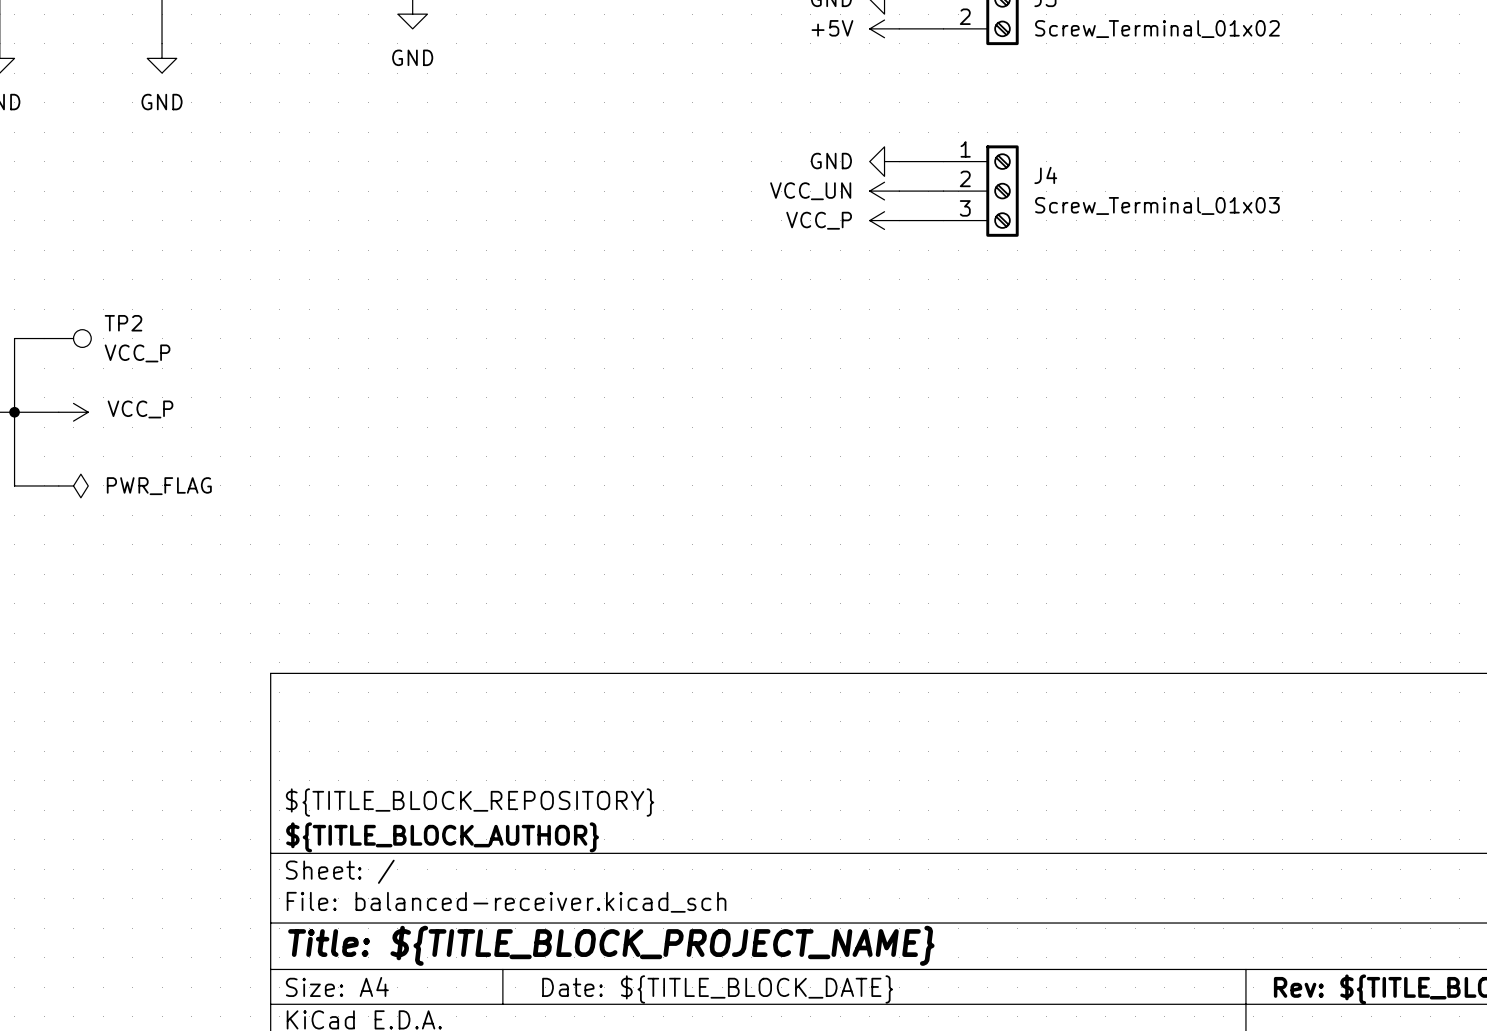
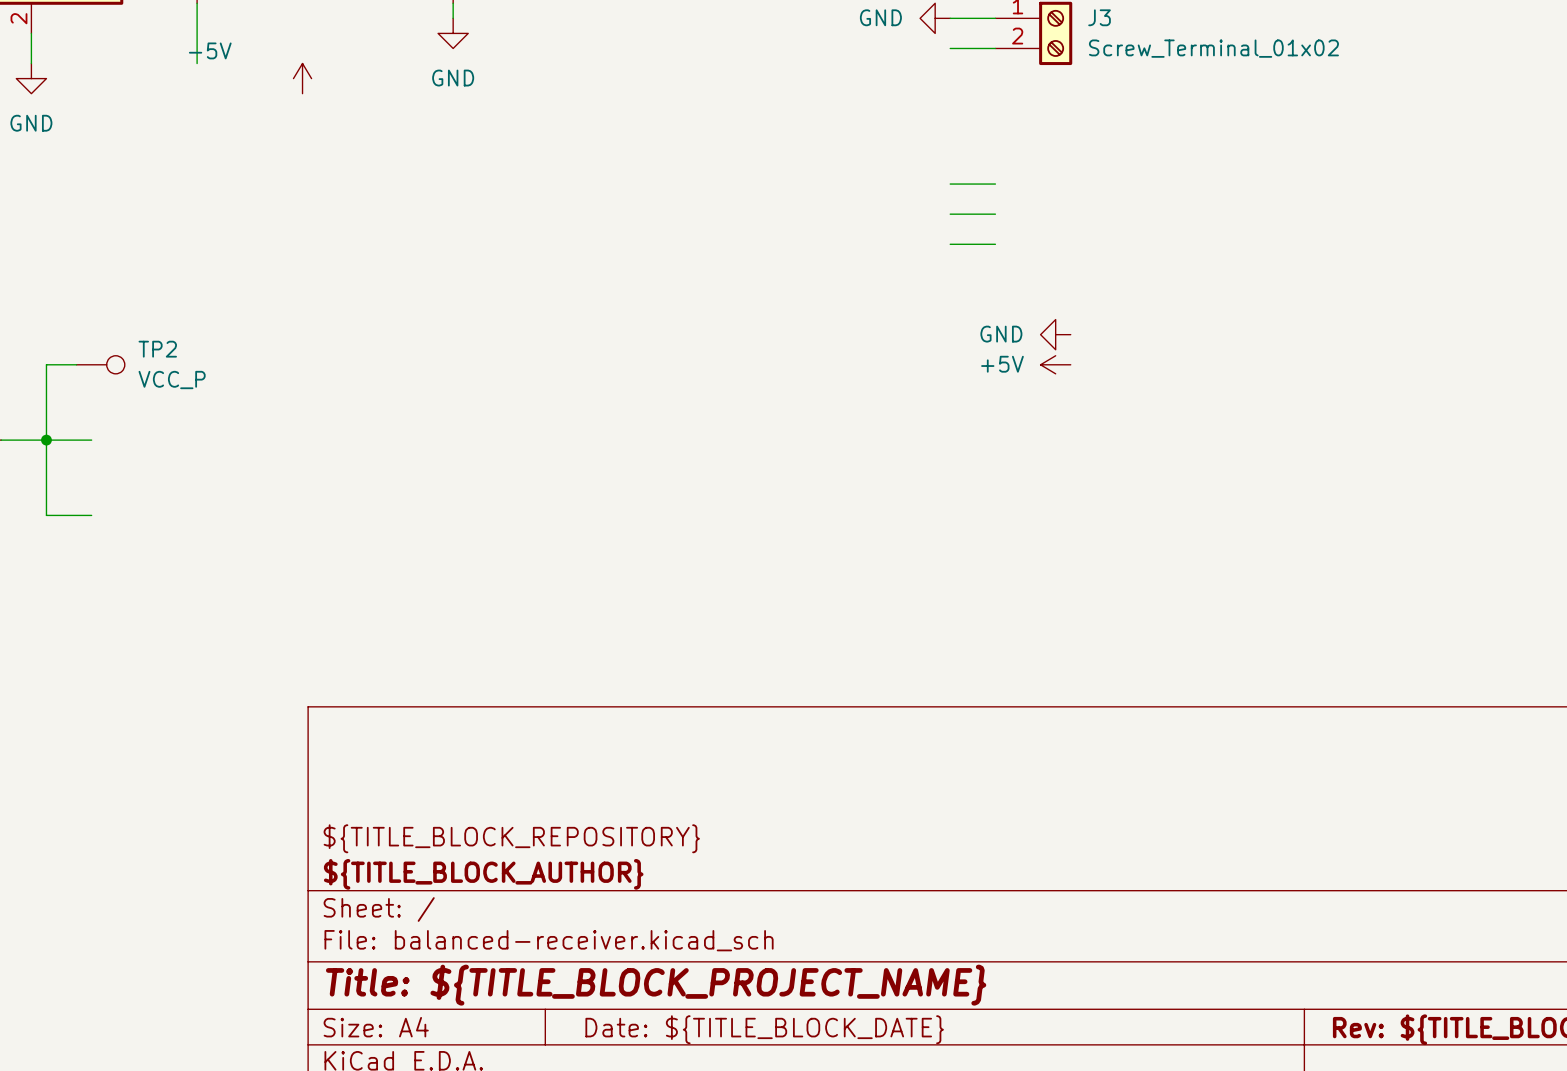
power symbol: +5V (884, 28) -> none
power symbol: GND (162, 58) -> none
power symbol: none -> -5V (302, 78)
power symbol position: GND (884, 161) -> GND (1055, 334)
power symbol: VCC_UN (884, 191) -> none
J4: Screw_Terminal_01x03 (981, 191) -> none
power symbol: VCC_P (884, 220) -> none
power symbol: none -> +5V (1055, 364)
power symbol: VCC_P (73, 412) -> none
power symbol: PWR_FLAG (73, 485) -> none

